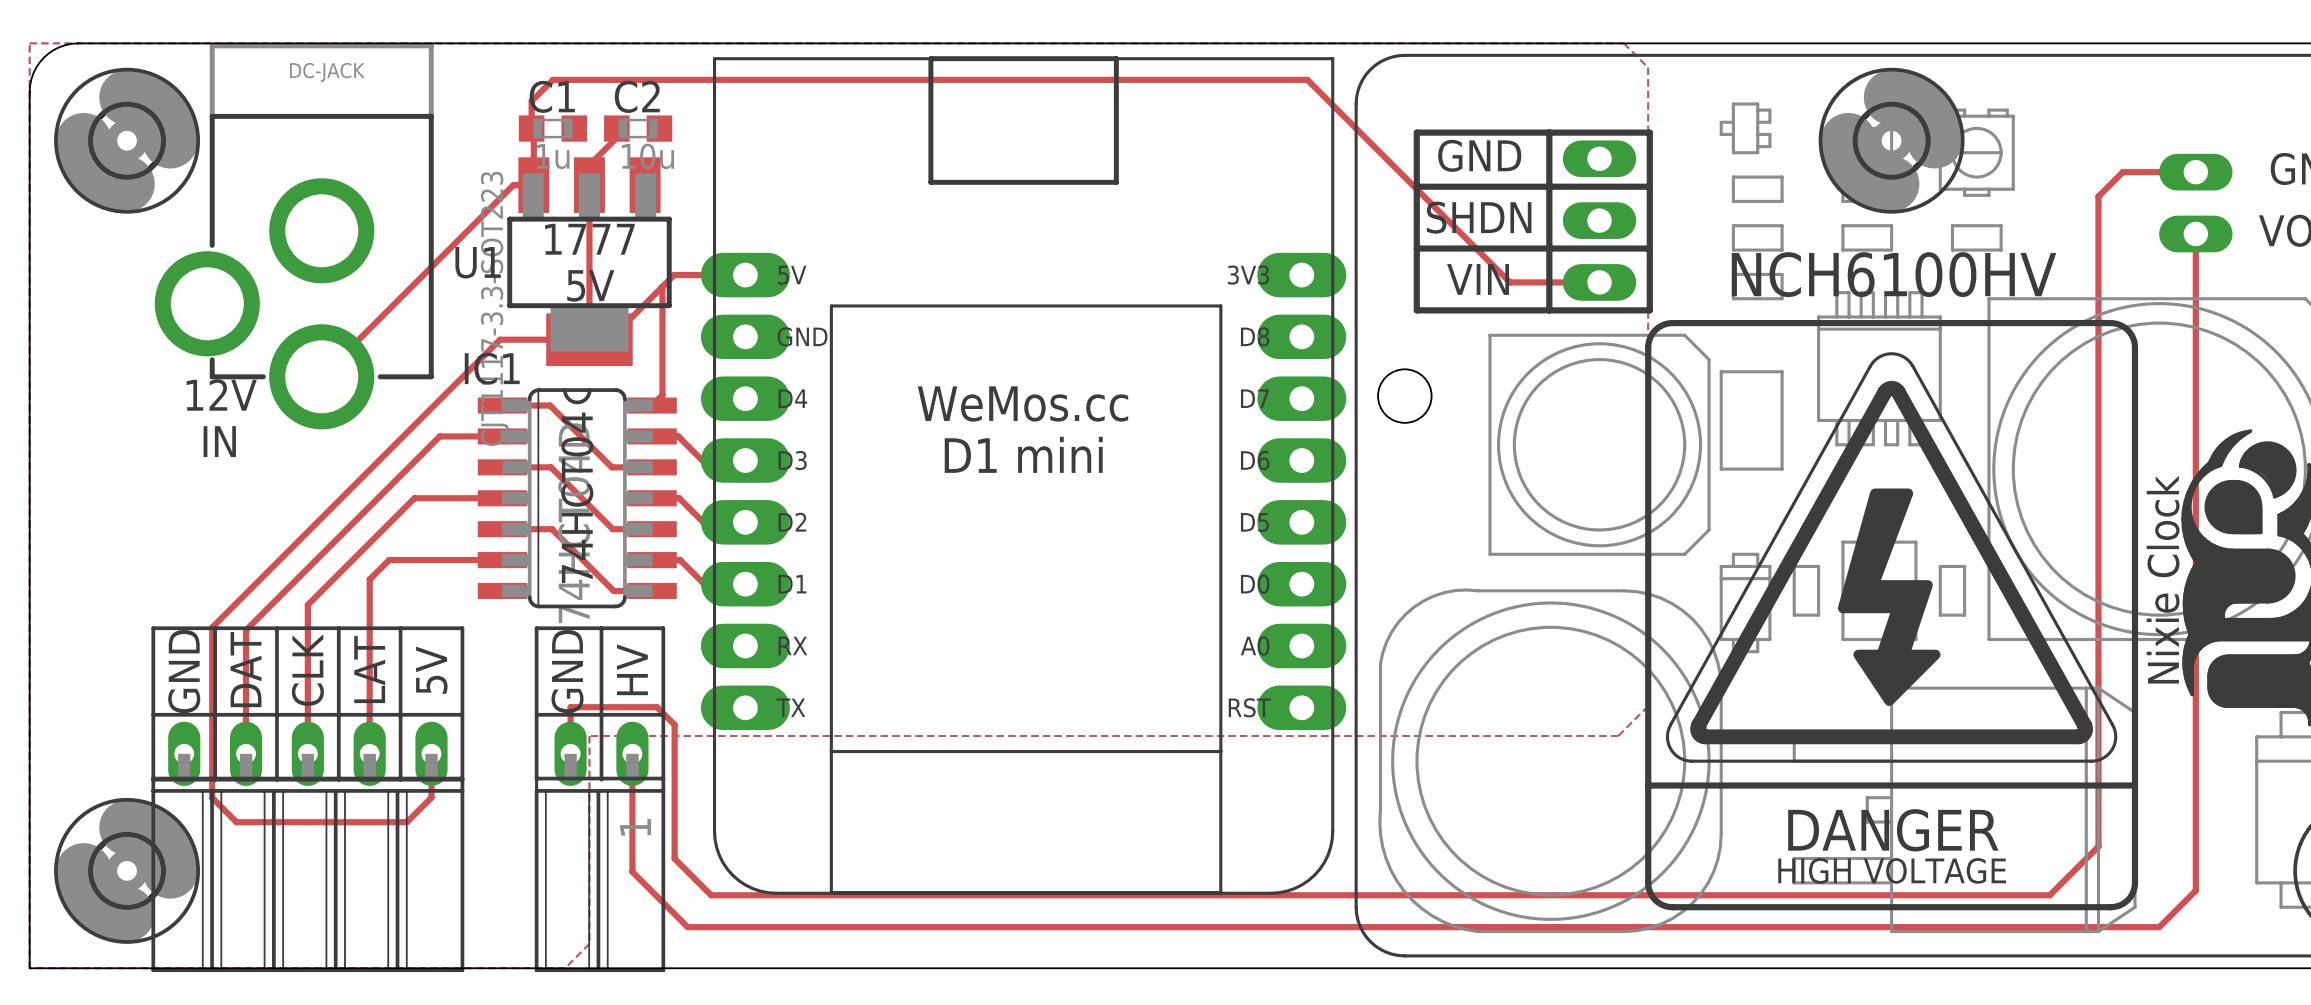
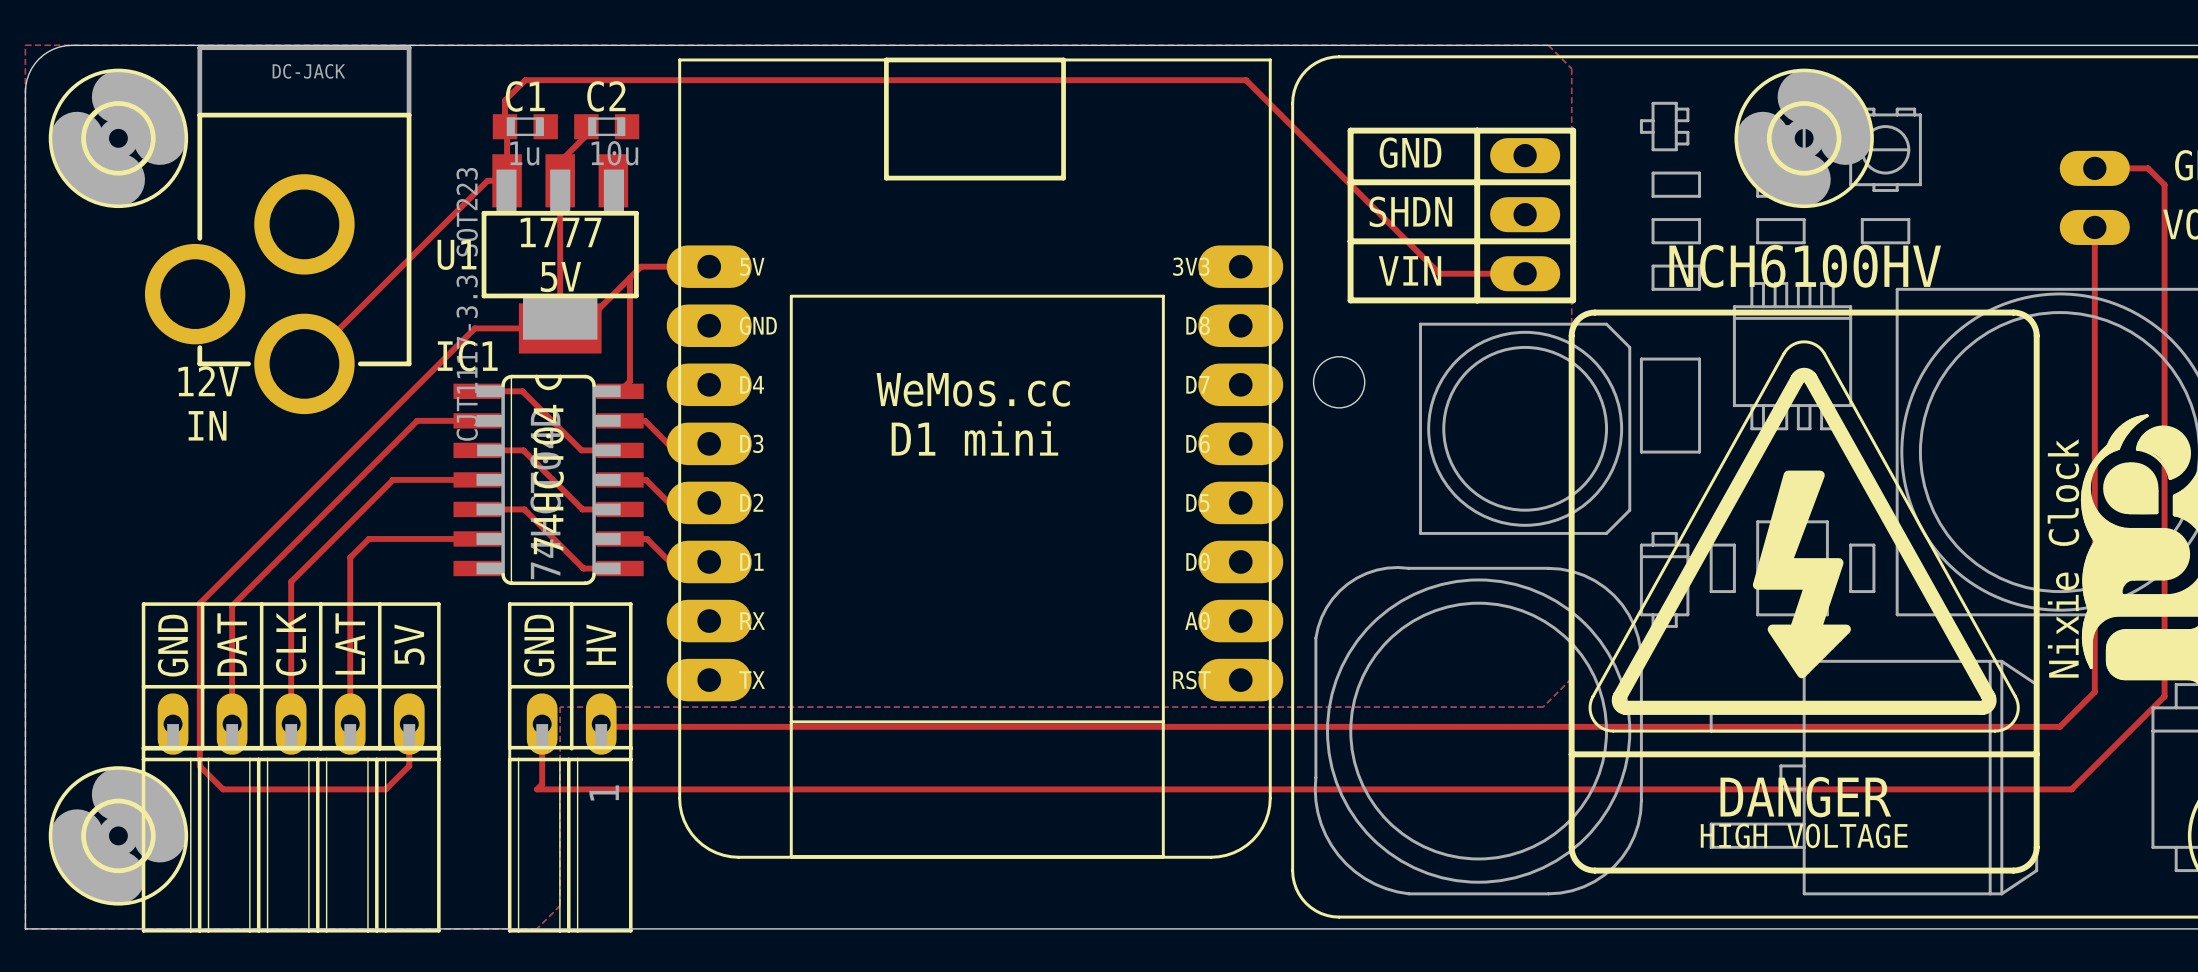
top track: (2195, 172) (2122, 172) (2098, 196) (2098, 846) (2049, 895) (711, 895) (674, 858) (674, 724) (657, 707) (570, 707) (570, 753) -> (2094, 168) (2148, 168) (2164, 184) (2164, 696) (2071, 789) (536, 789) (542, 784) (542, 724)
top track: (2195, 720) (2195, 890) (2159, 927) (687, 927) (632, 871) (632, 753) -> (2094, 691) (2059, 726) (607, 726) (601, 724)

